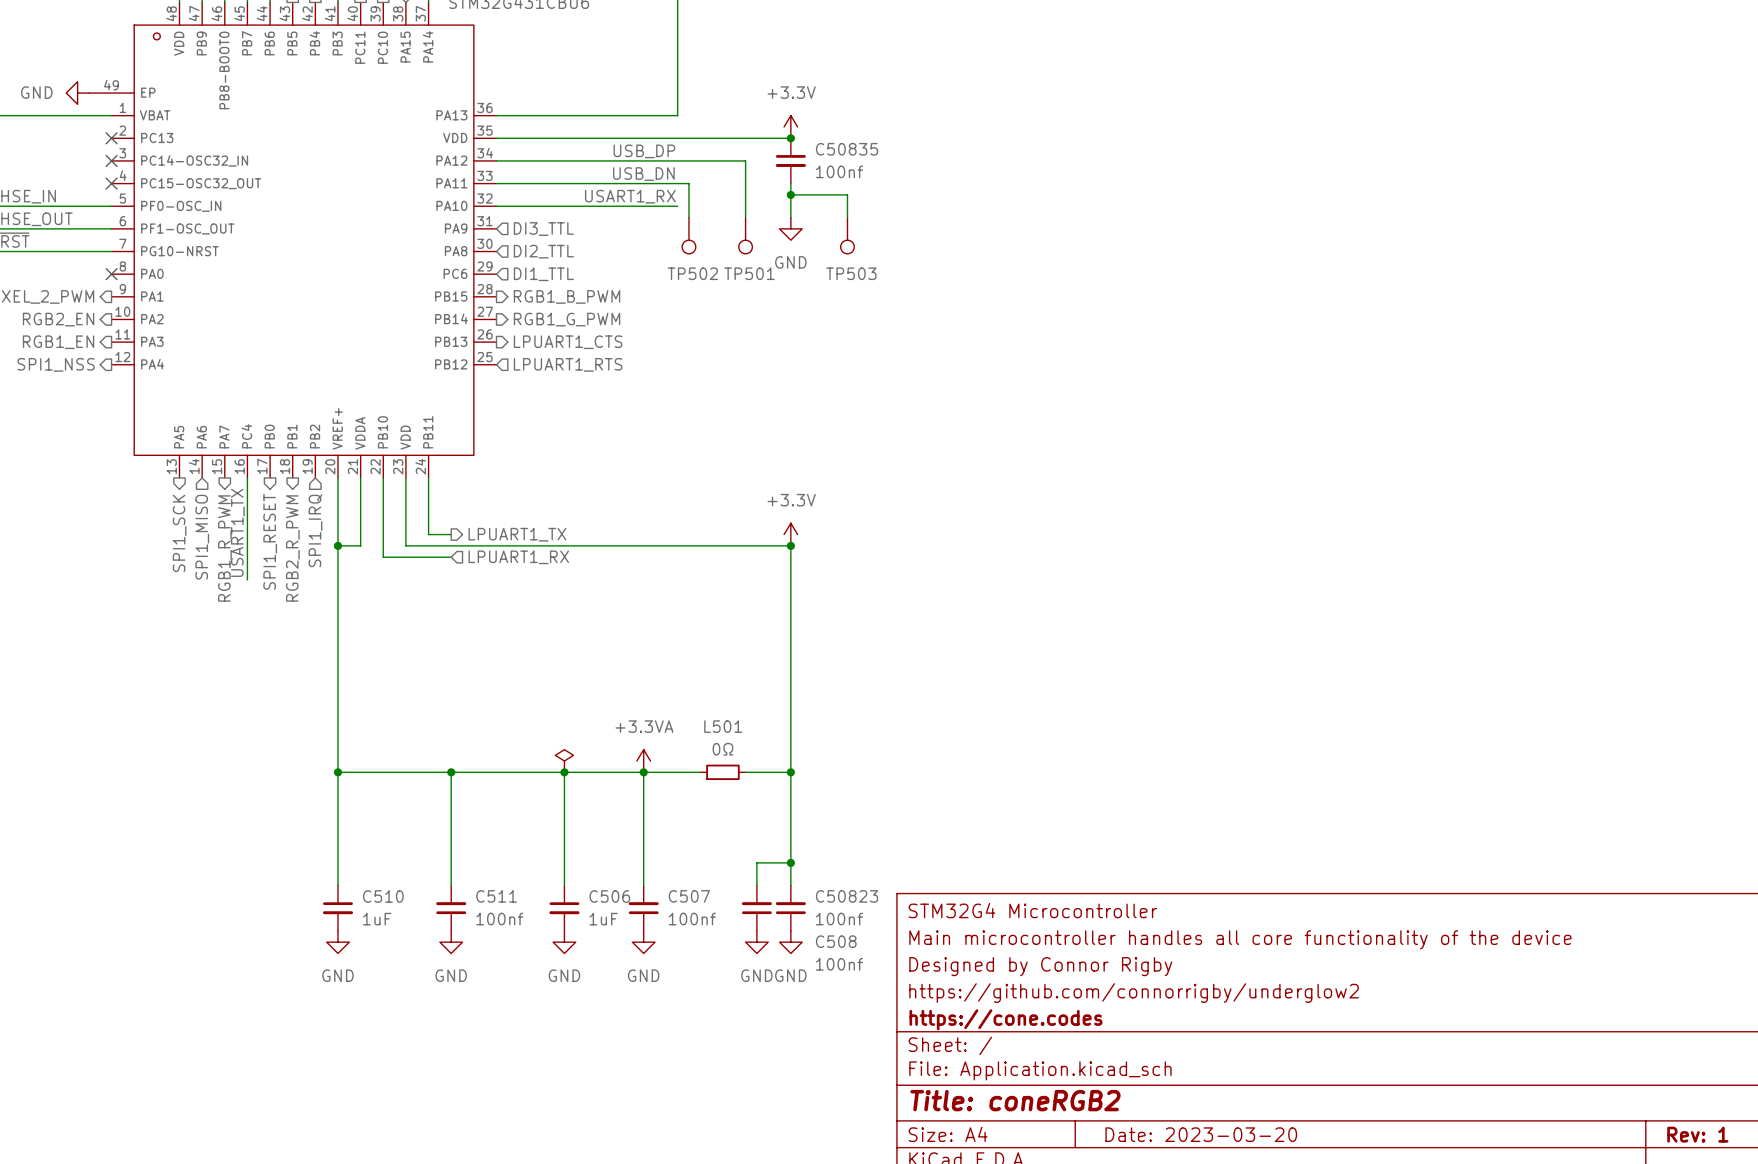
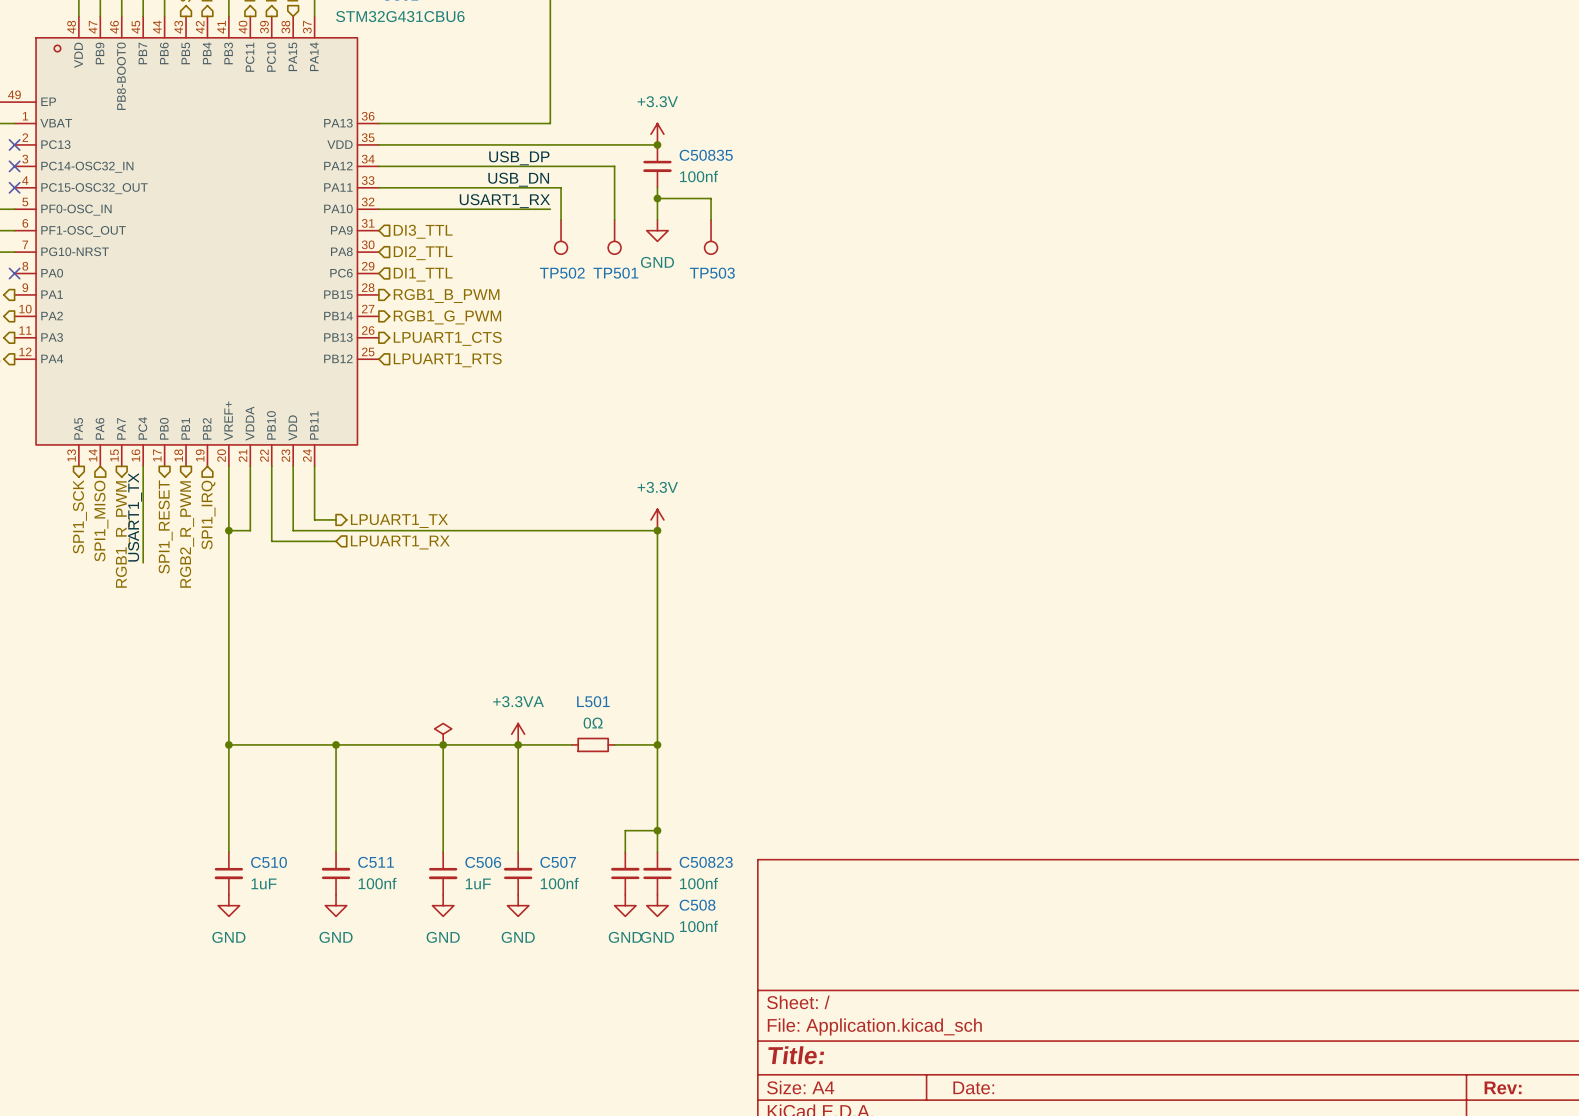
title block: STM32G4 Microcontroller (1032, 910) -> none
title block: Main microcontroller handles all core functionality of the device (1240, 939) -> none
title block: Designed by Connor Rigby (1040, 966) -> none
title block: https://github.com/connorrigby/underglow2 (1134, 993) -> none
title block: https://cone.codes (1006, 1019) -> none
title block: Title: coneRGB2 (1015, 1100) -> Title: (796, 1055)
title block: Date: 2023-03-20 (1201, 1134) -> Date: (973, 1087)
title block: Rev: 1 (1697, 1134) -> Rev: (1503, 1087)

